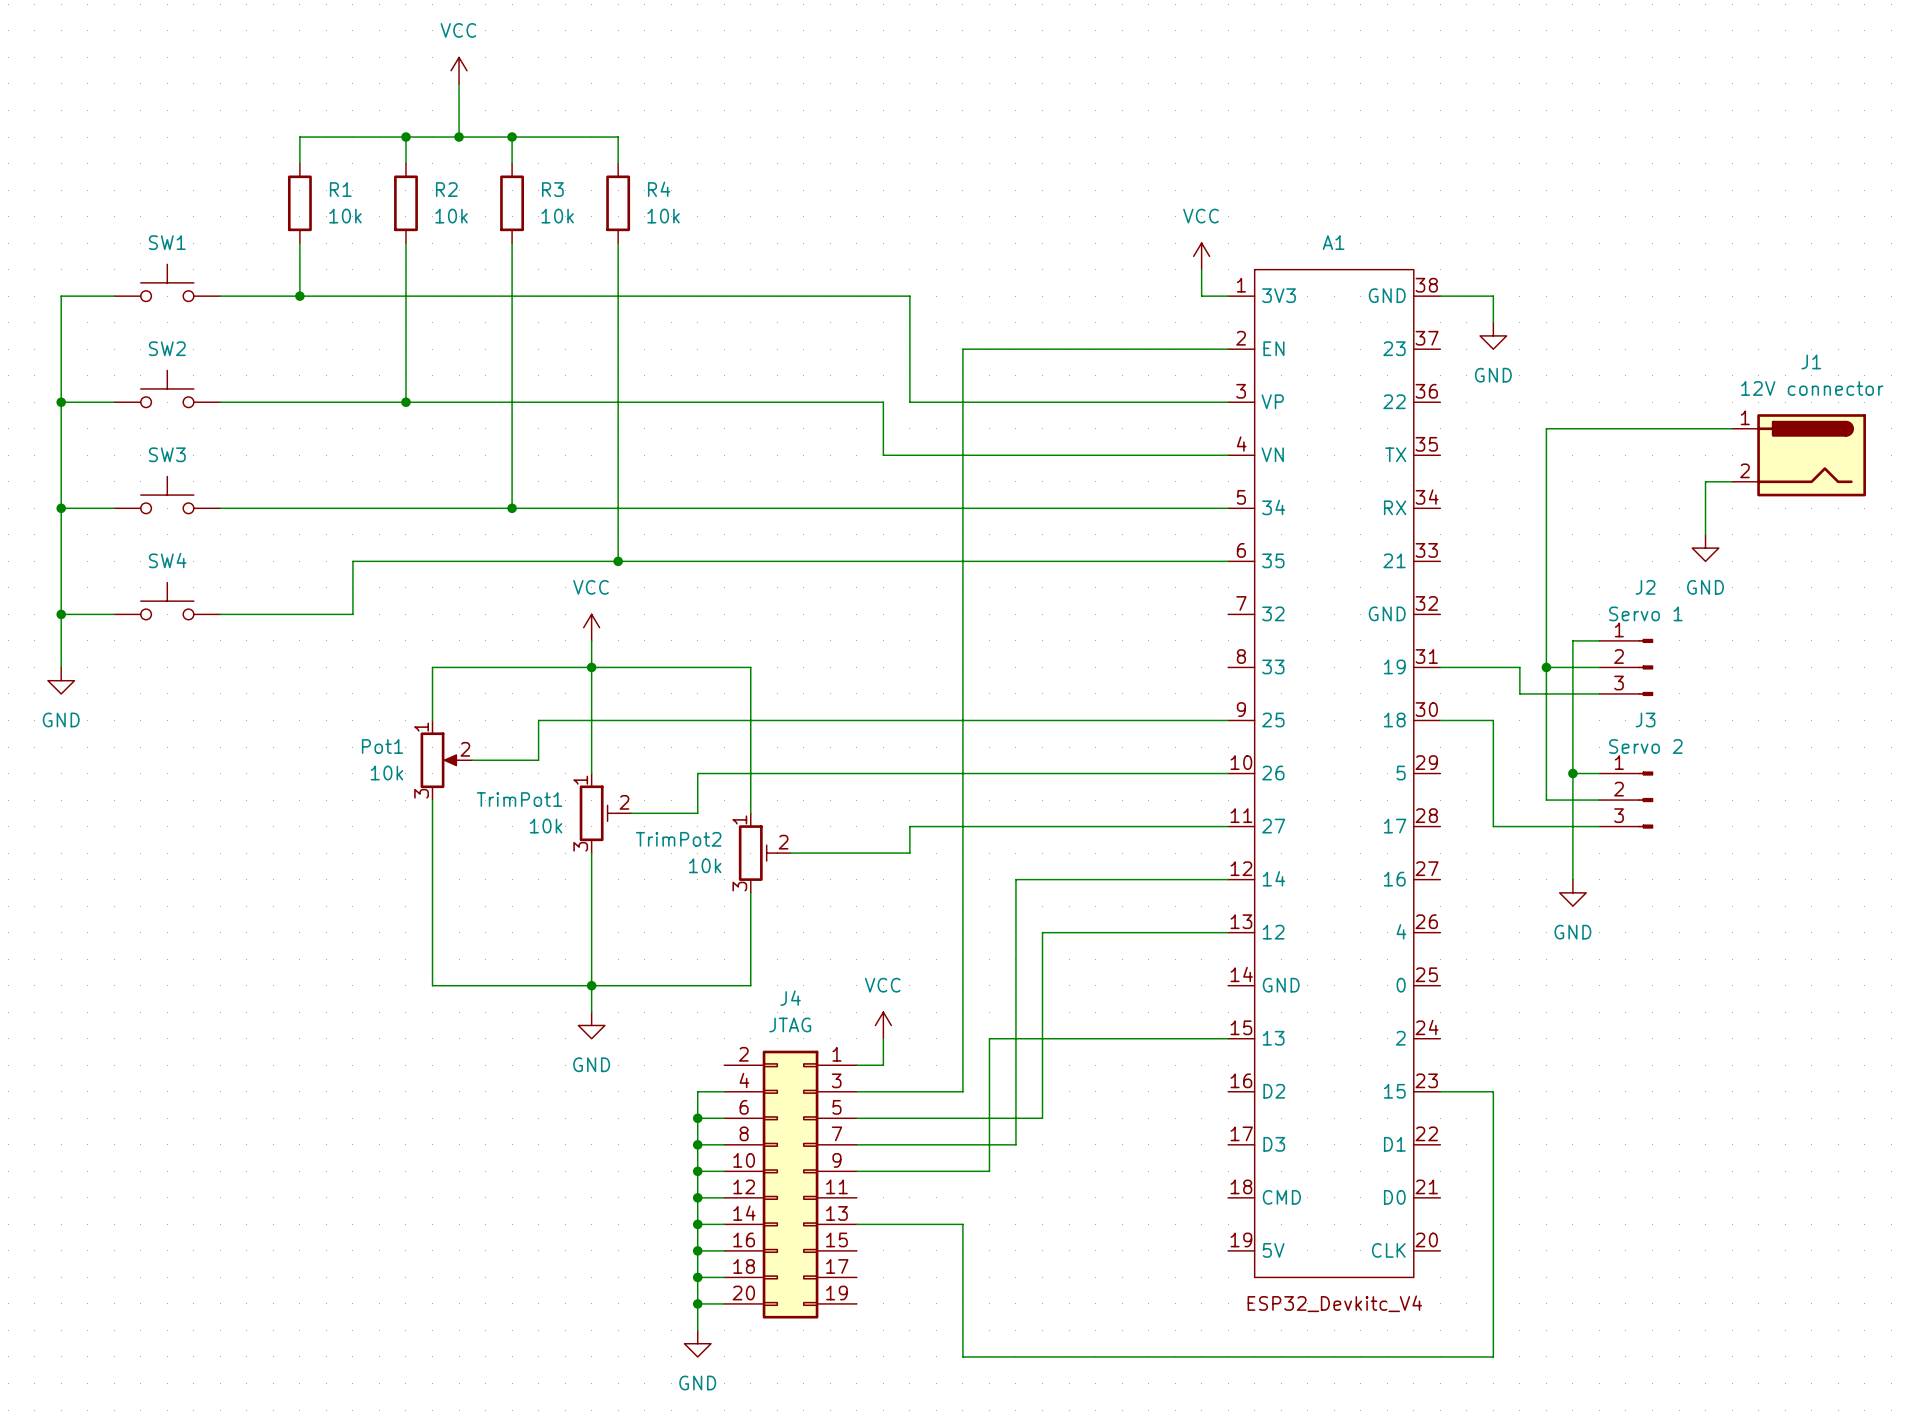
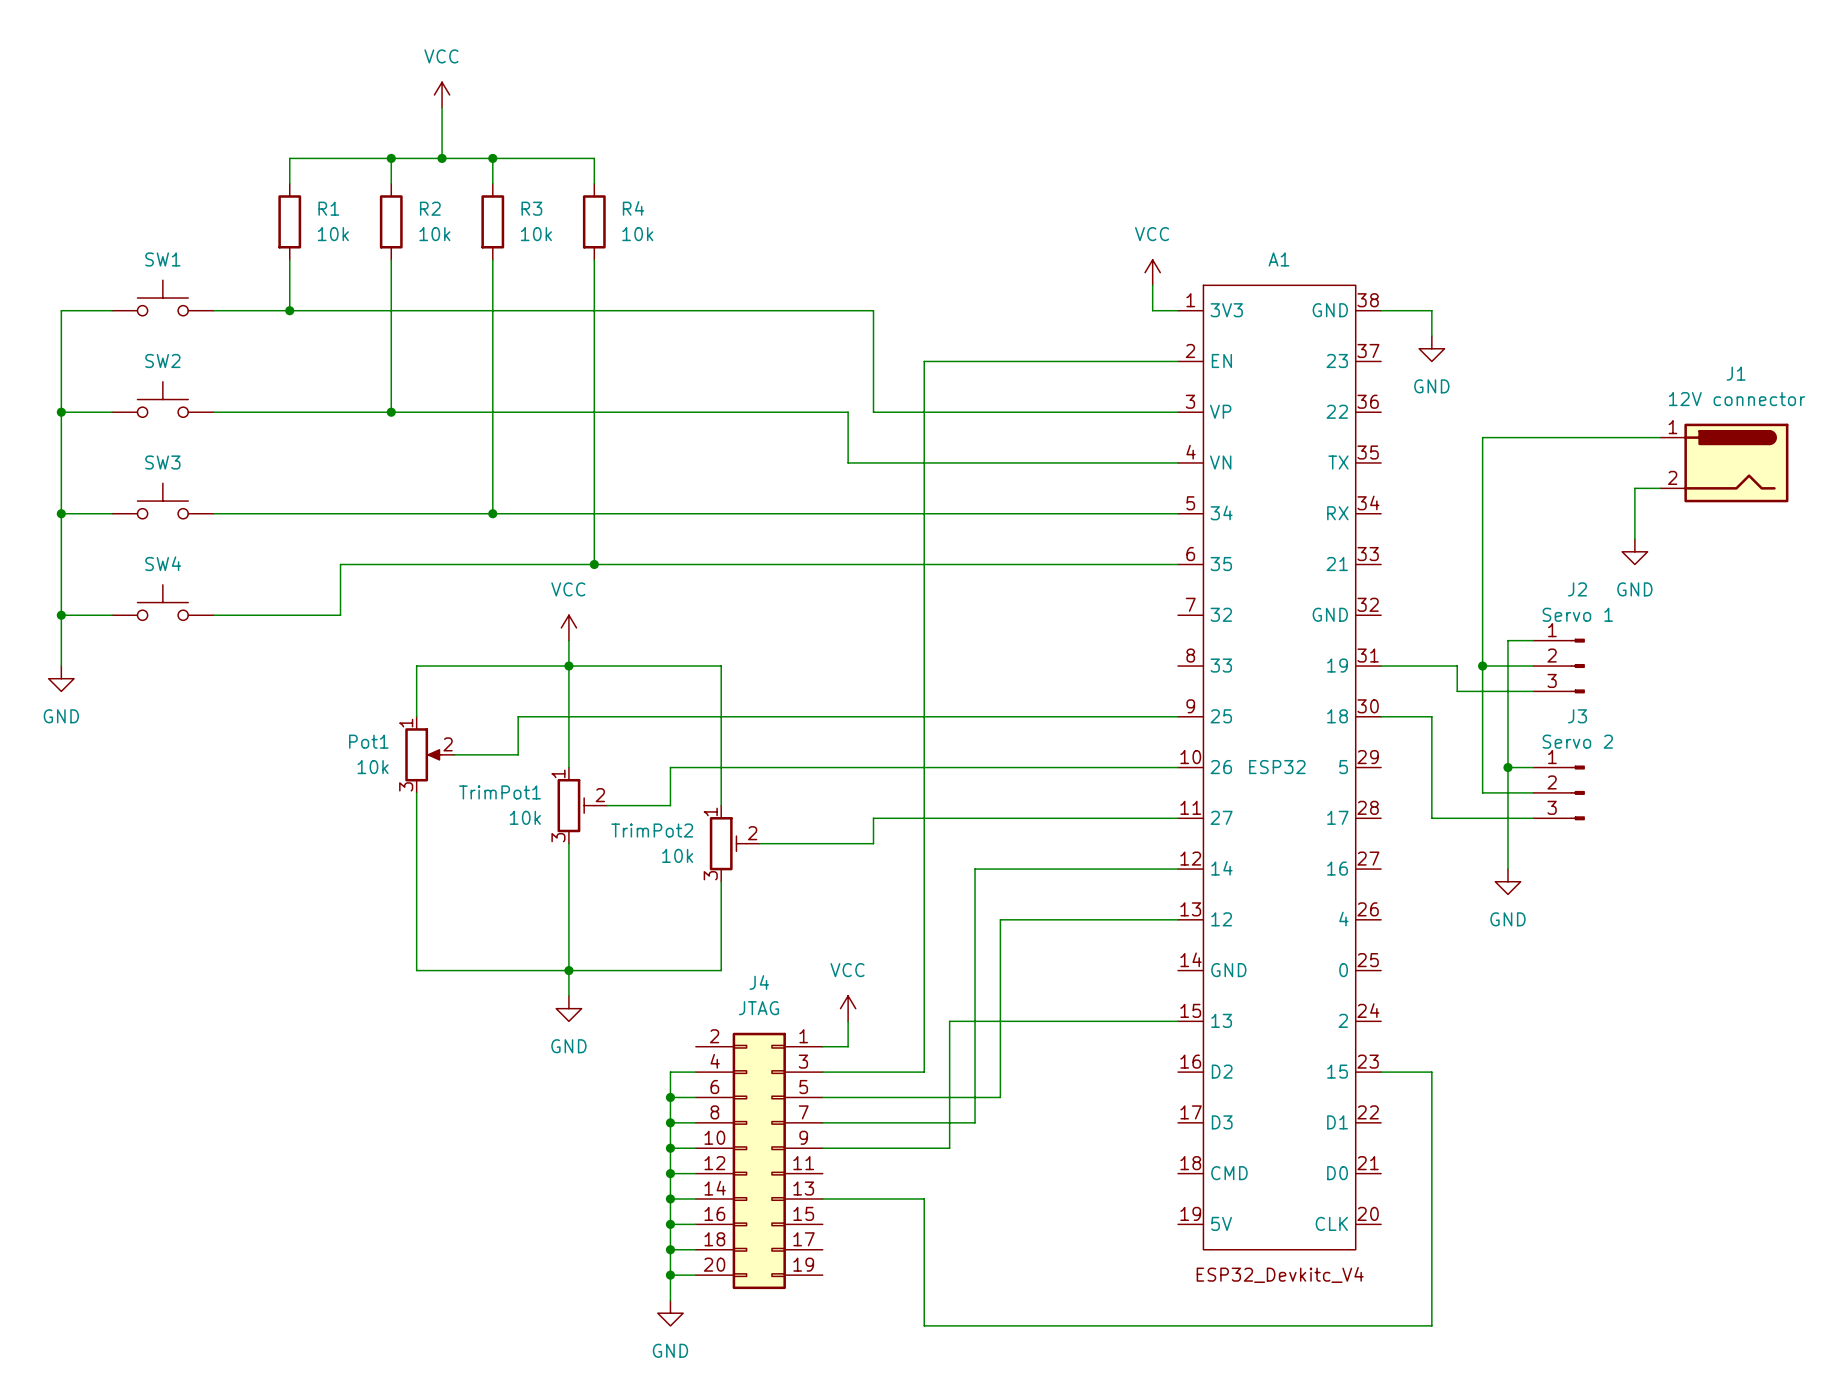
A1 value: none -> ESP32 (1277, 767)

